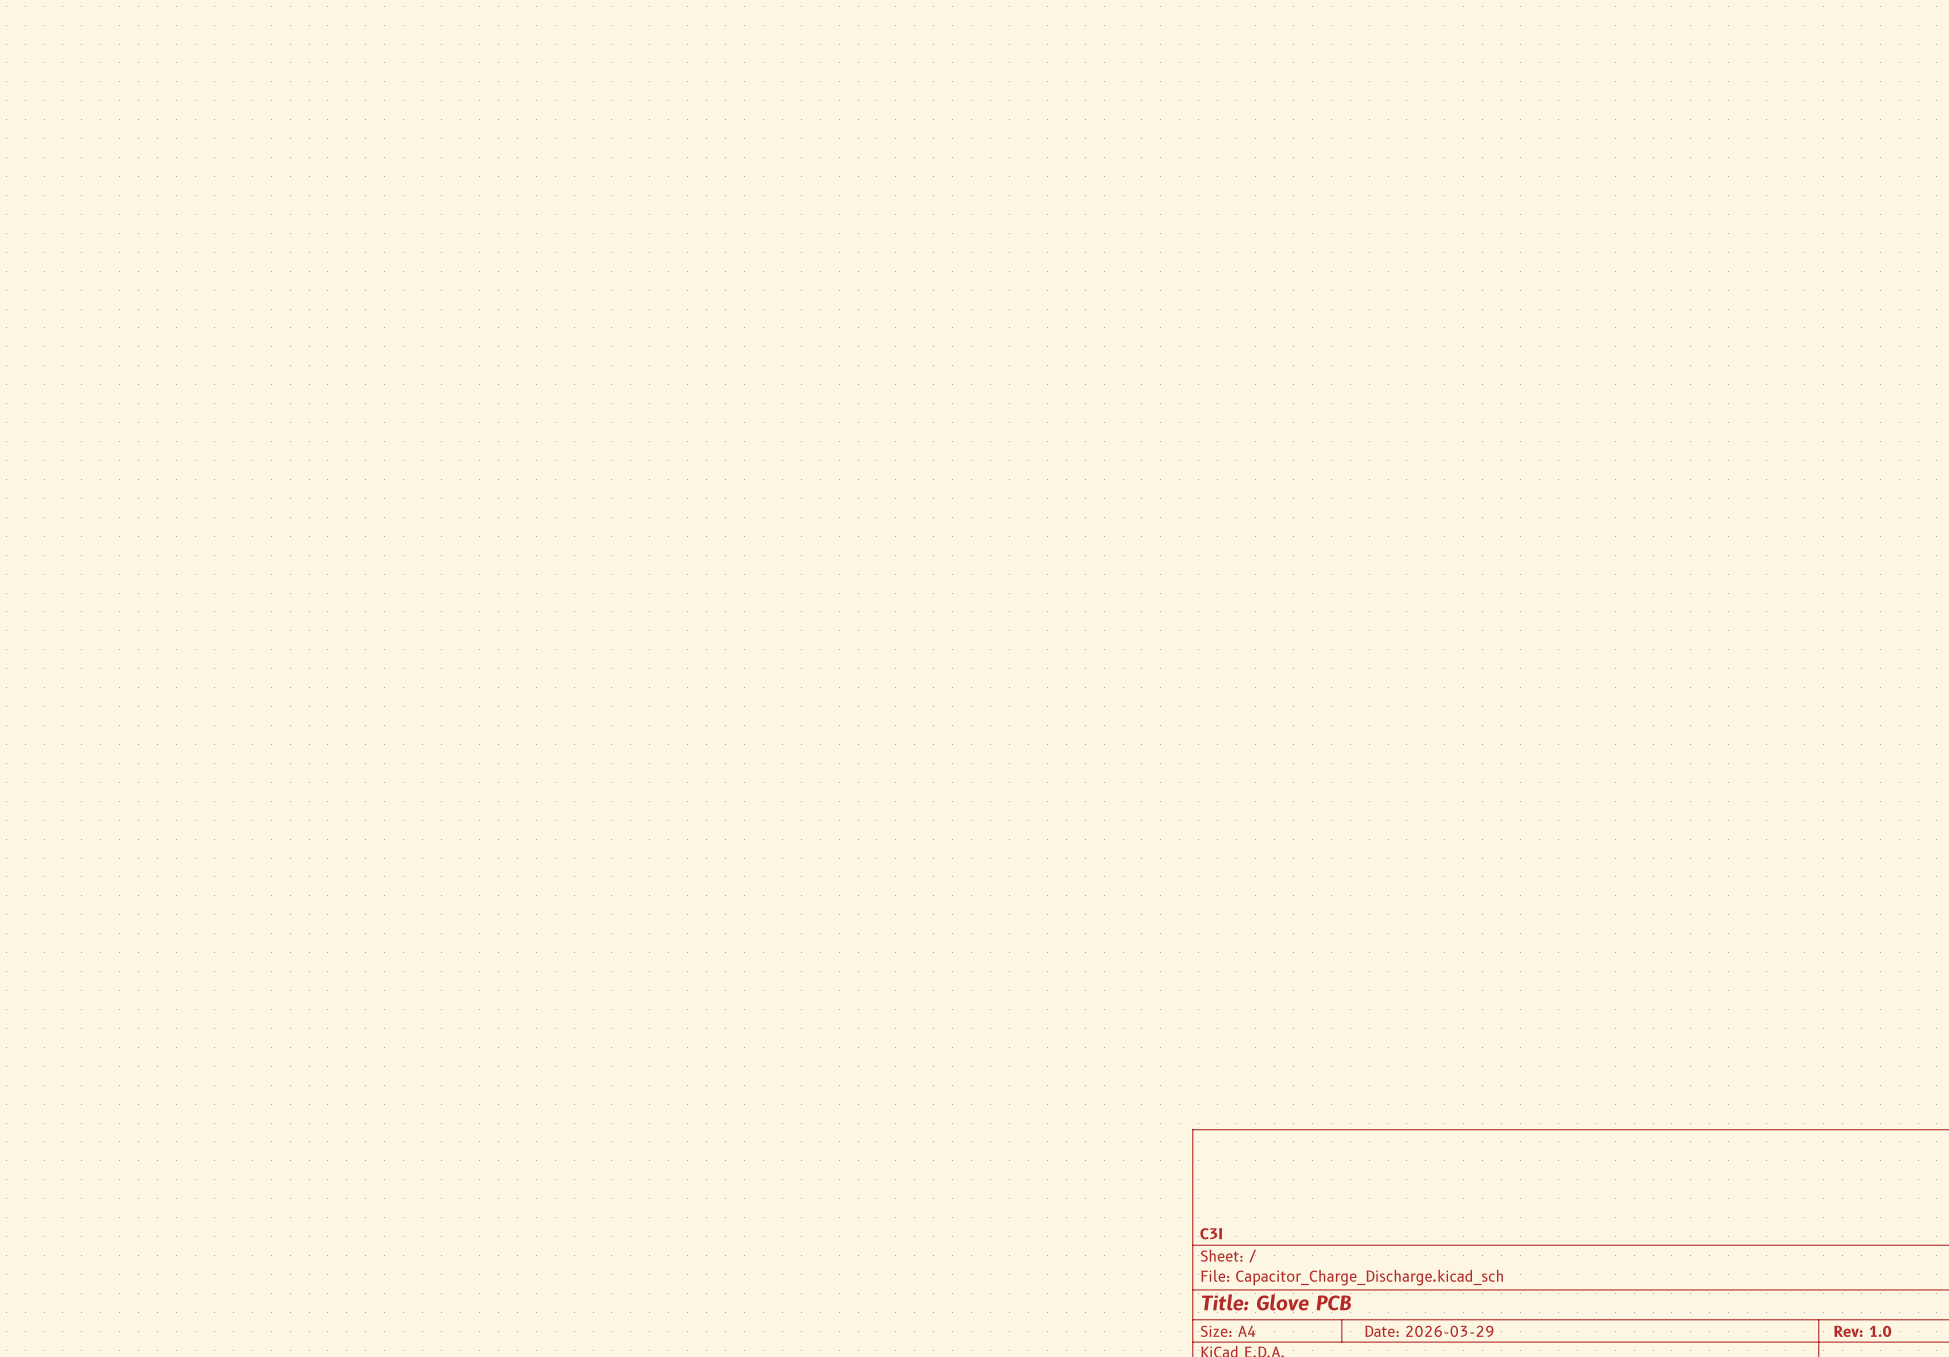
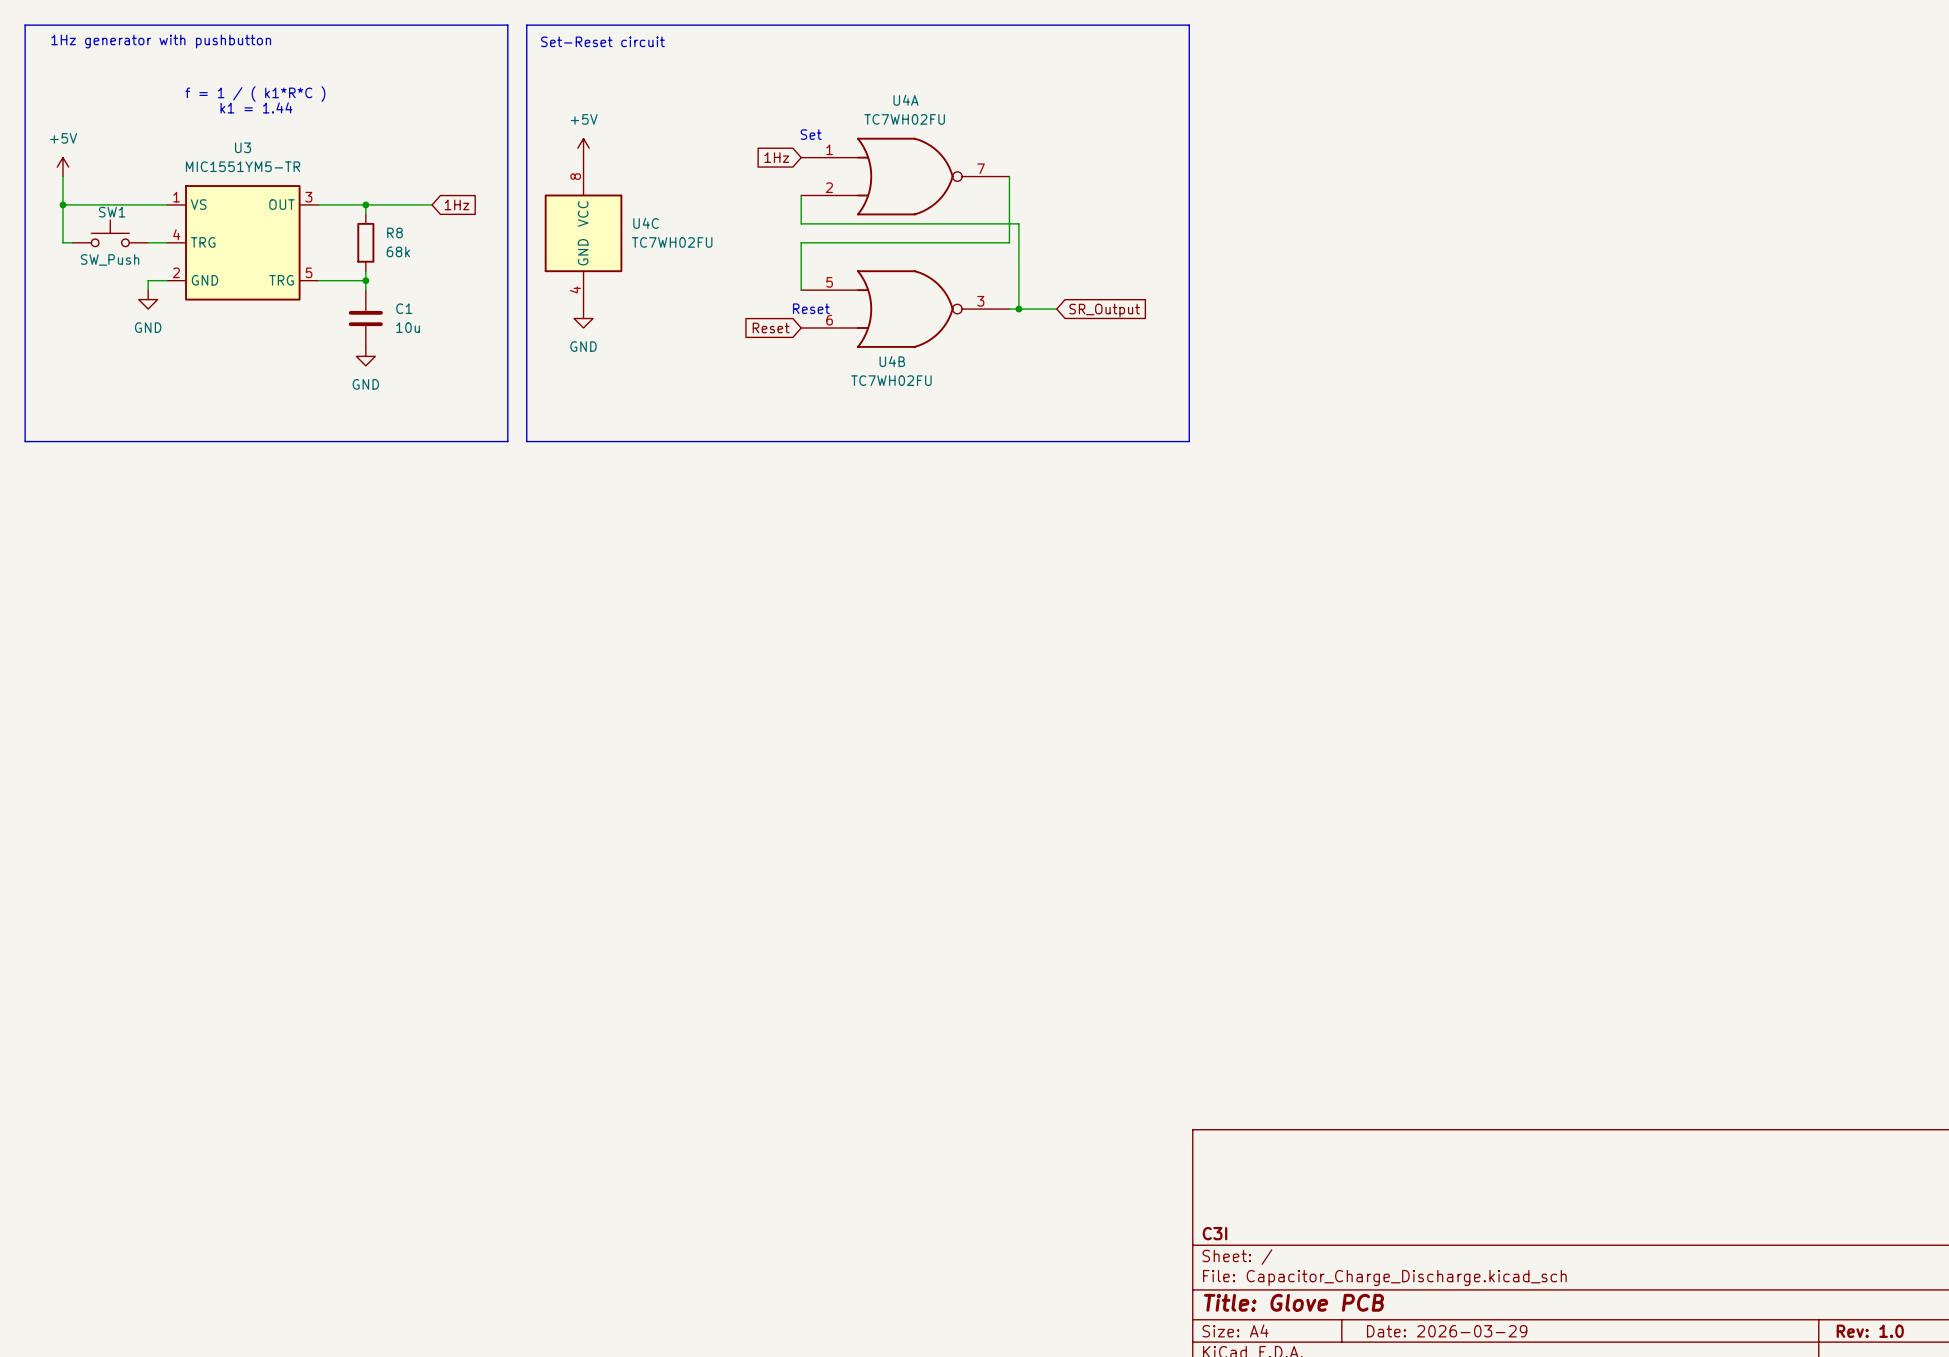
line: none -> (25, 25) (507, 25) (507, 441) (25, 441) (25, 25)
line: none -> (526, 25) (1189, 25) (1189, 441) (526, 441) (526, 25)
text: none -> 1Hz generator with pushbutton (161, 41)
text: none -> Set-Reset circuit (602, 41)
text: none -> f = 1 / ( k1*R*C ) (255, 94)
text: none -> k1 = 1.44 (256, 107)
text: none -> Set (811, 134)
power symbol: none -> +5V (583, 148)
global label: none -> 1Hz (776, 157)
power symbol: none -> +5V (62, 167)
wire: none -> (62, 176) (62, 242) (72, 242)
U4A: none -> TC7WH02FU (905, 176)
wire: none -> (1009, 176) (1009, 242) (801, 242) (801, 290)
wire: none -> (801, 195) (801, 223) (1018, 223) (1018, 309)
wire: none -> (62, 204) (167, 204)
junction: none -> (62, 204)
wire: none -> (318, 204) (432, 204)
wire: none -> (365, 204) (365, 214)
junction: none -> (365, 204)
global label: none -> 1Hz (457, 204)
SW1: none -> SW_Push (110, 233)
U4C: none -> TC7WH02FU (583, 233)
wire: none -> (148, 242) (167, 242)
U3: none -> MIC1551YM5-TR (242, 242)
R8: none -> 68k (365, 242)
wire: none -> (365, 271) (365, 290)
wire: none -> (167, 280) (148, 280) (148, 290)
wire: none -> (318, 280) (365, 280)
junction: none -> (365, 280)
power symbol: none -> GND (148, 299)
text: none -> Reset (811, 308)
U4B: none -> TC7WH02FU (905, 309)
wire: none -> (1009, 309) (1056, 309)
junction: none -> (1018, 309)
global label: none -> SR_Output (1104, 310)
C1: none -> 10u (365, 318)
power symbol: none -> GND (583, 318)
global label: none -> Reset (771, 327)
power symbol: none -> GND (365, 356)

